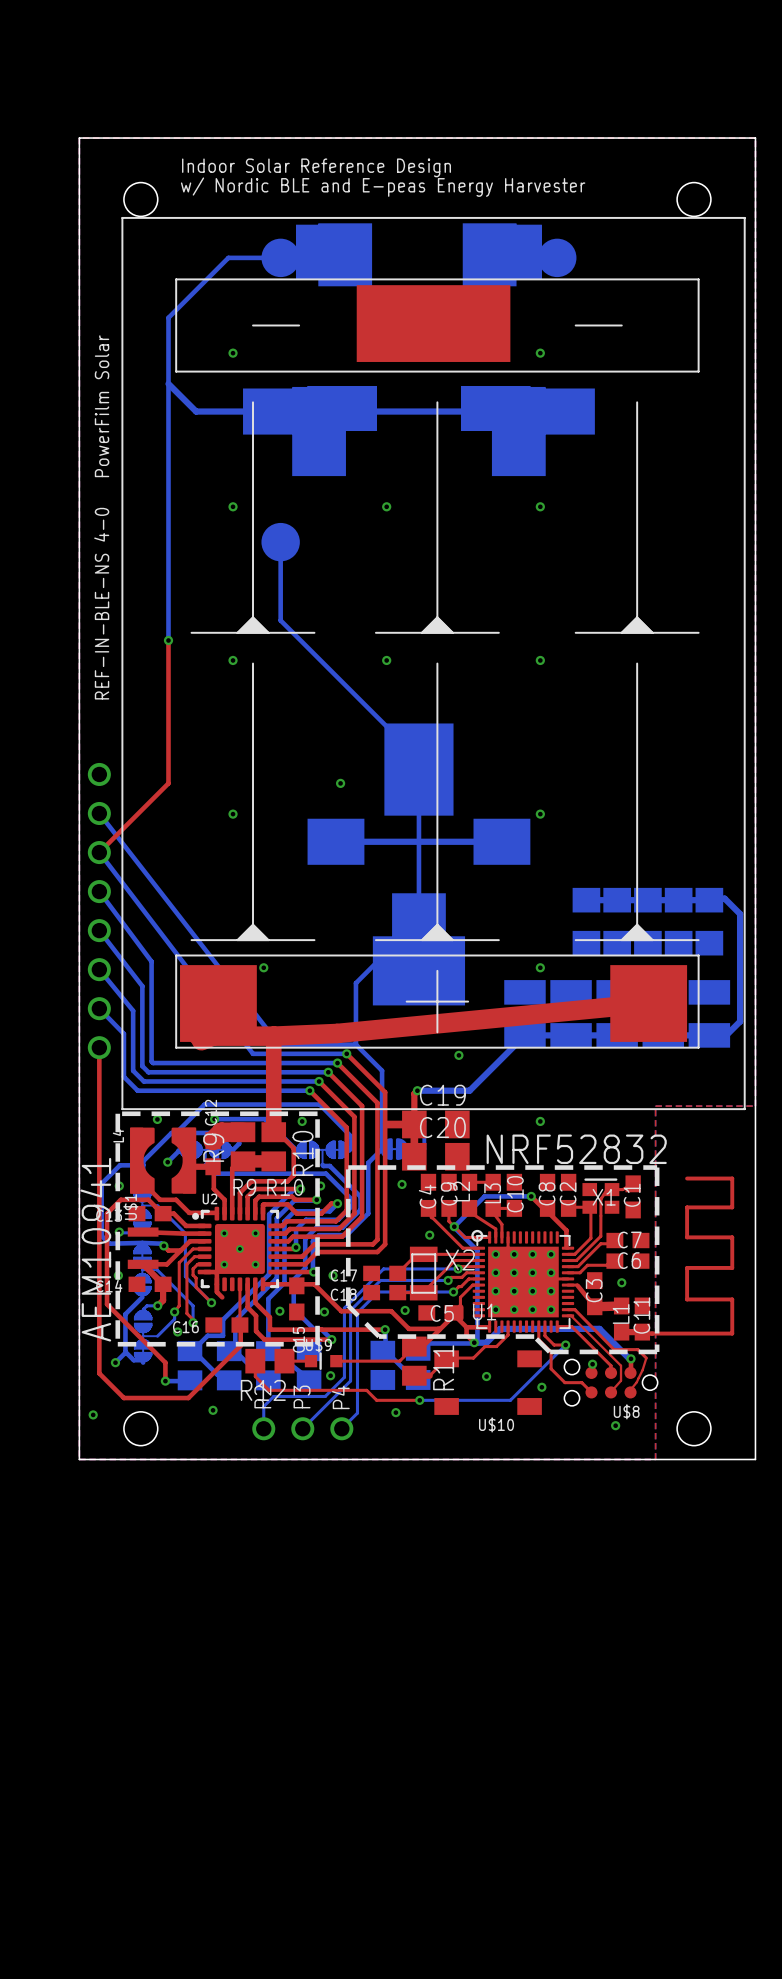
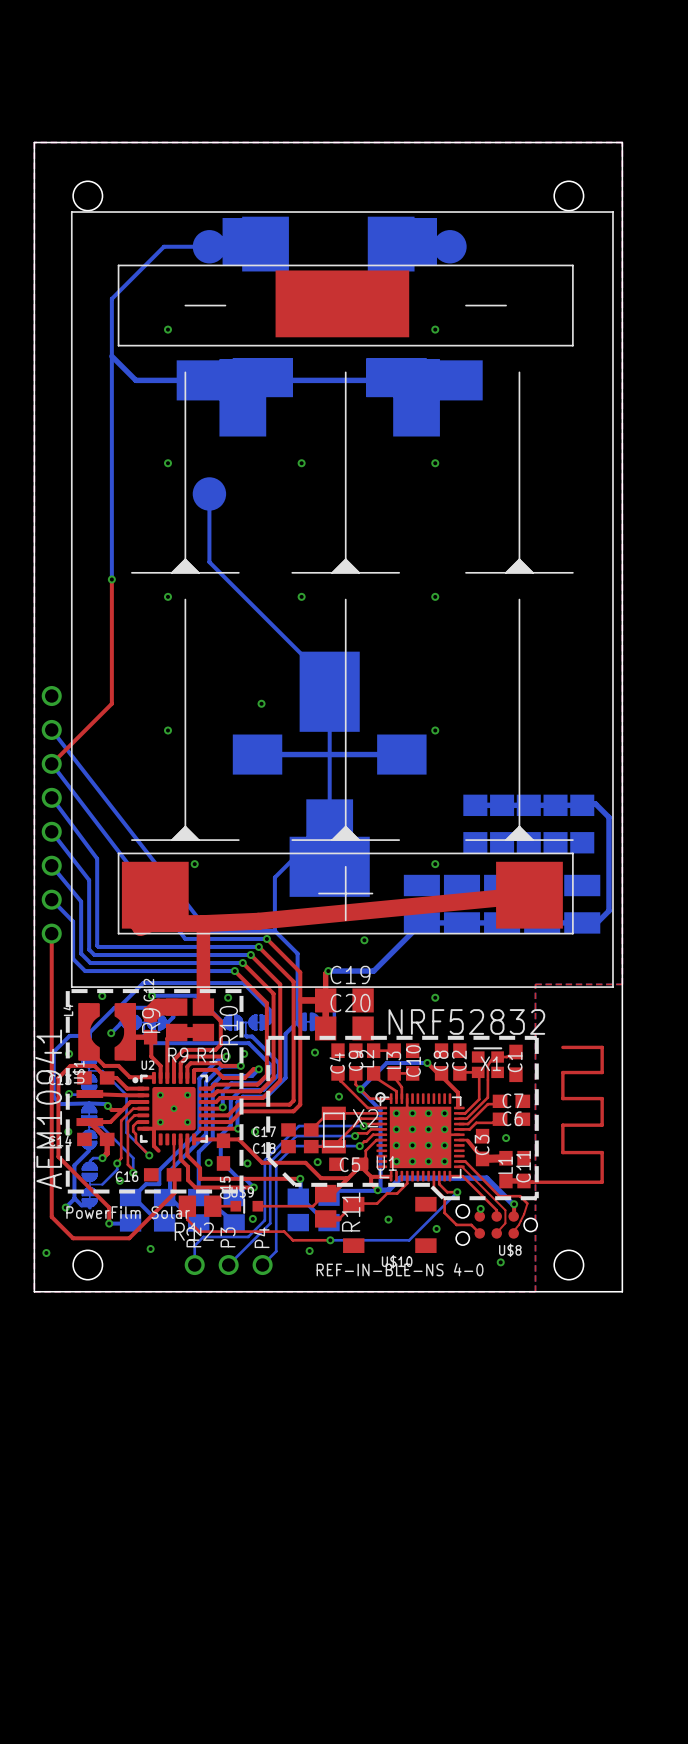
text: Indoor Solar Reference Design (316, 167) -> none
text: w/ Nordic BLE and E-peas Energy Harvester (383, 187) -> none
text: PowerFilm Solar (102, 406) -> none
text: REF-IN-BLE-NS 4-0 (101, 603) -> none
text: none -> PowerFilm Solar (128, 1212)
text: none -> REF-IN-BLE-NS 4-0 (400, 1269)

